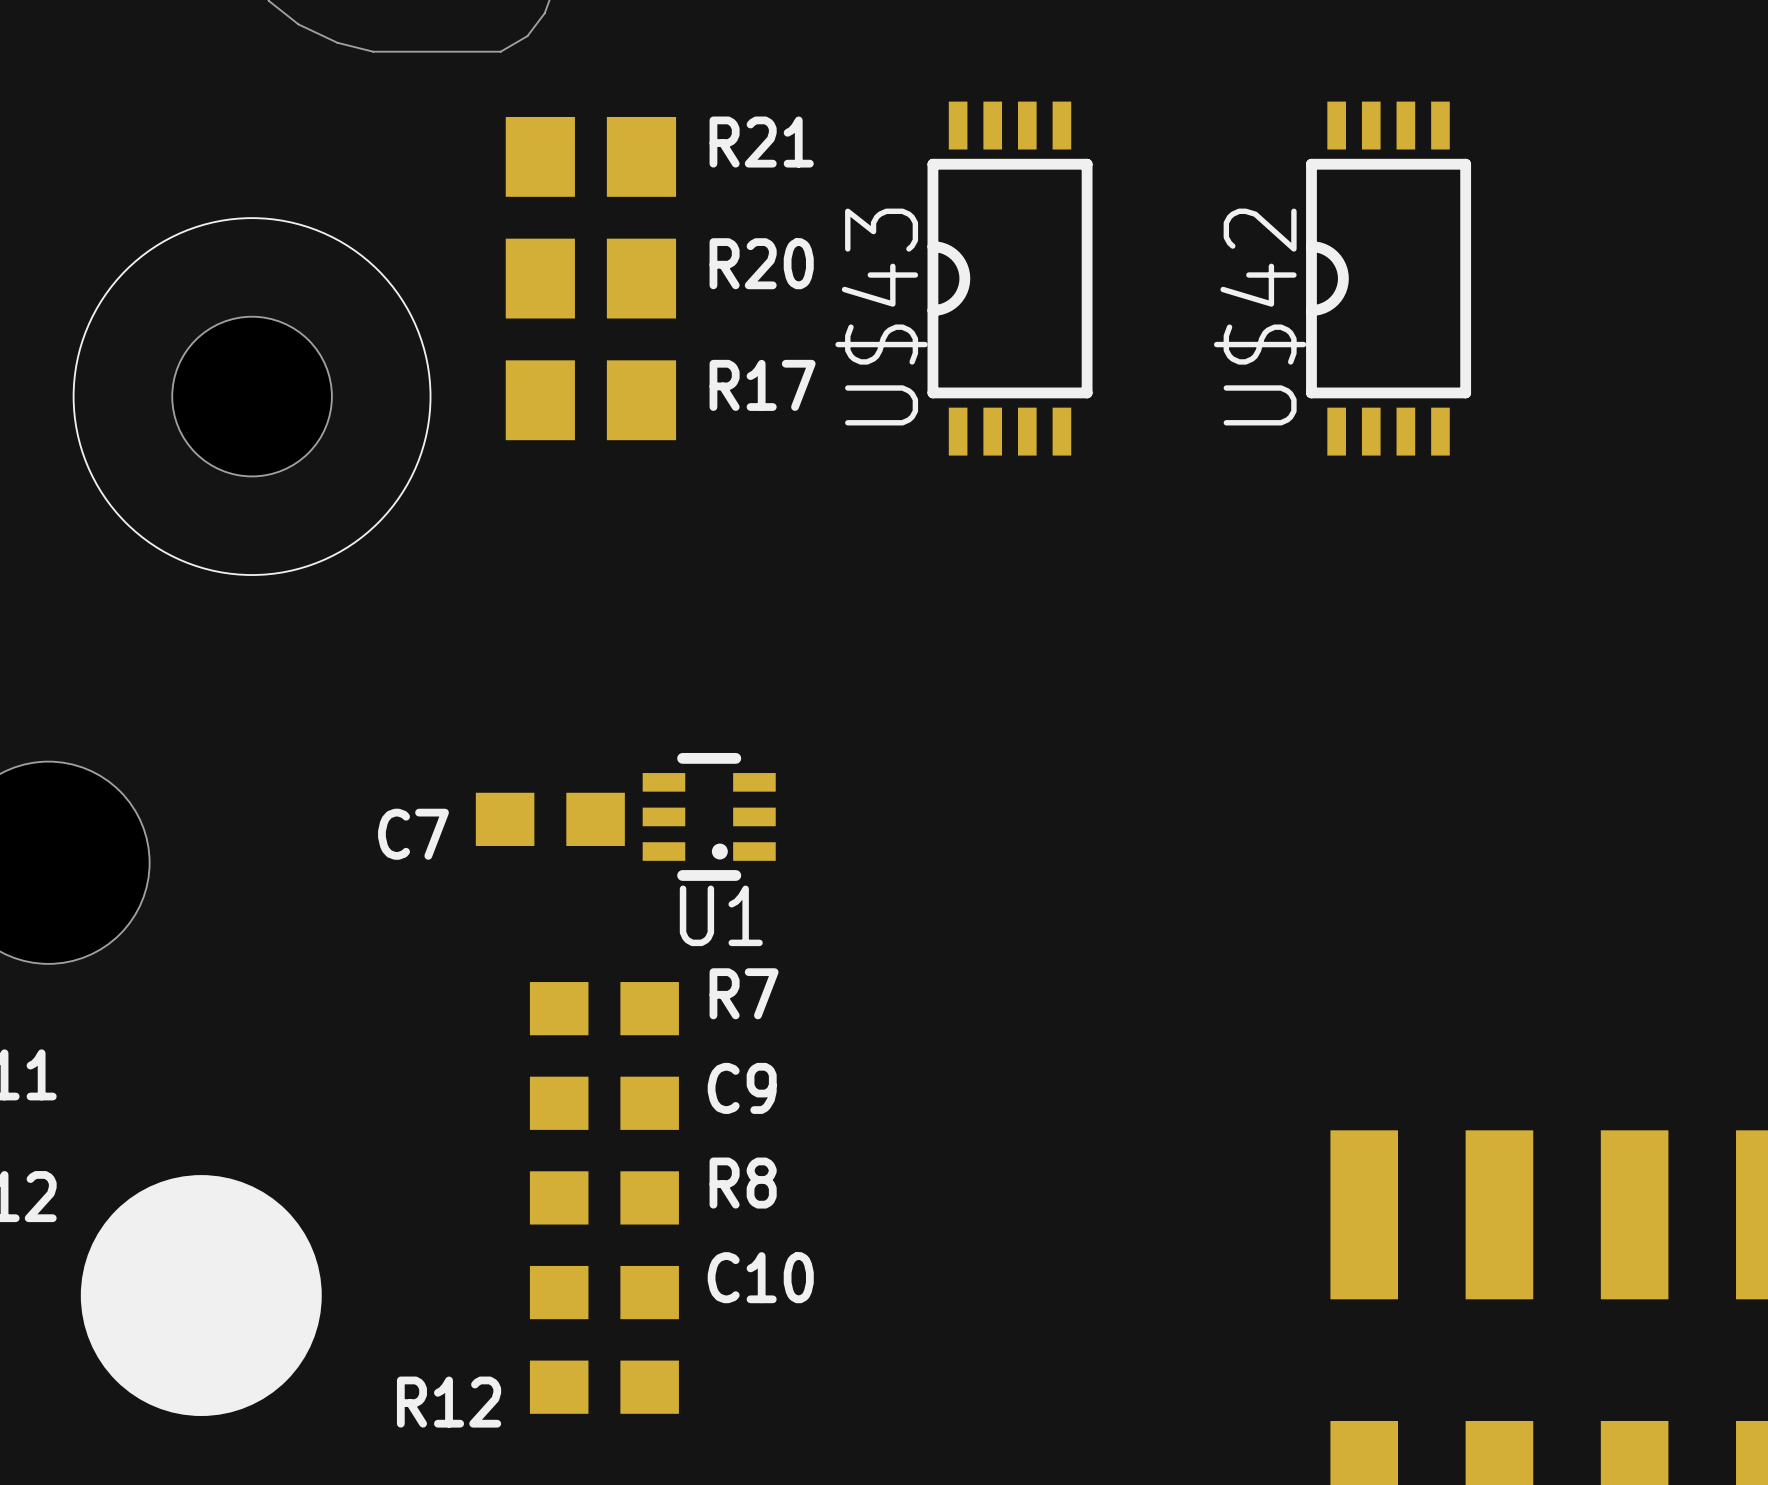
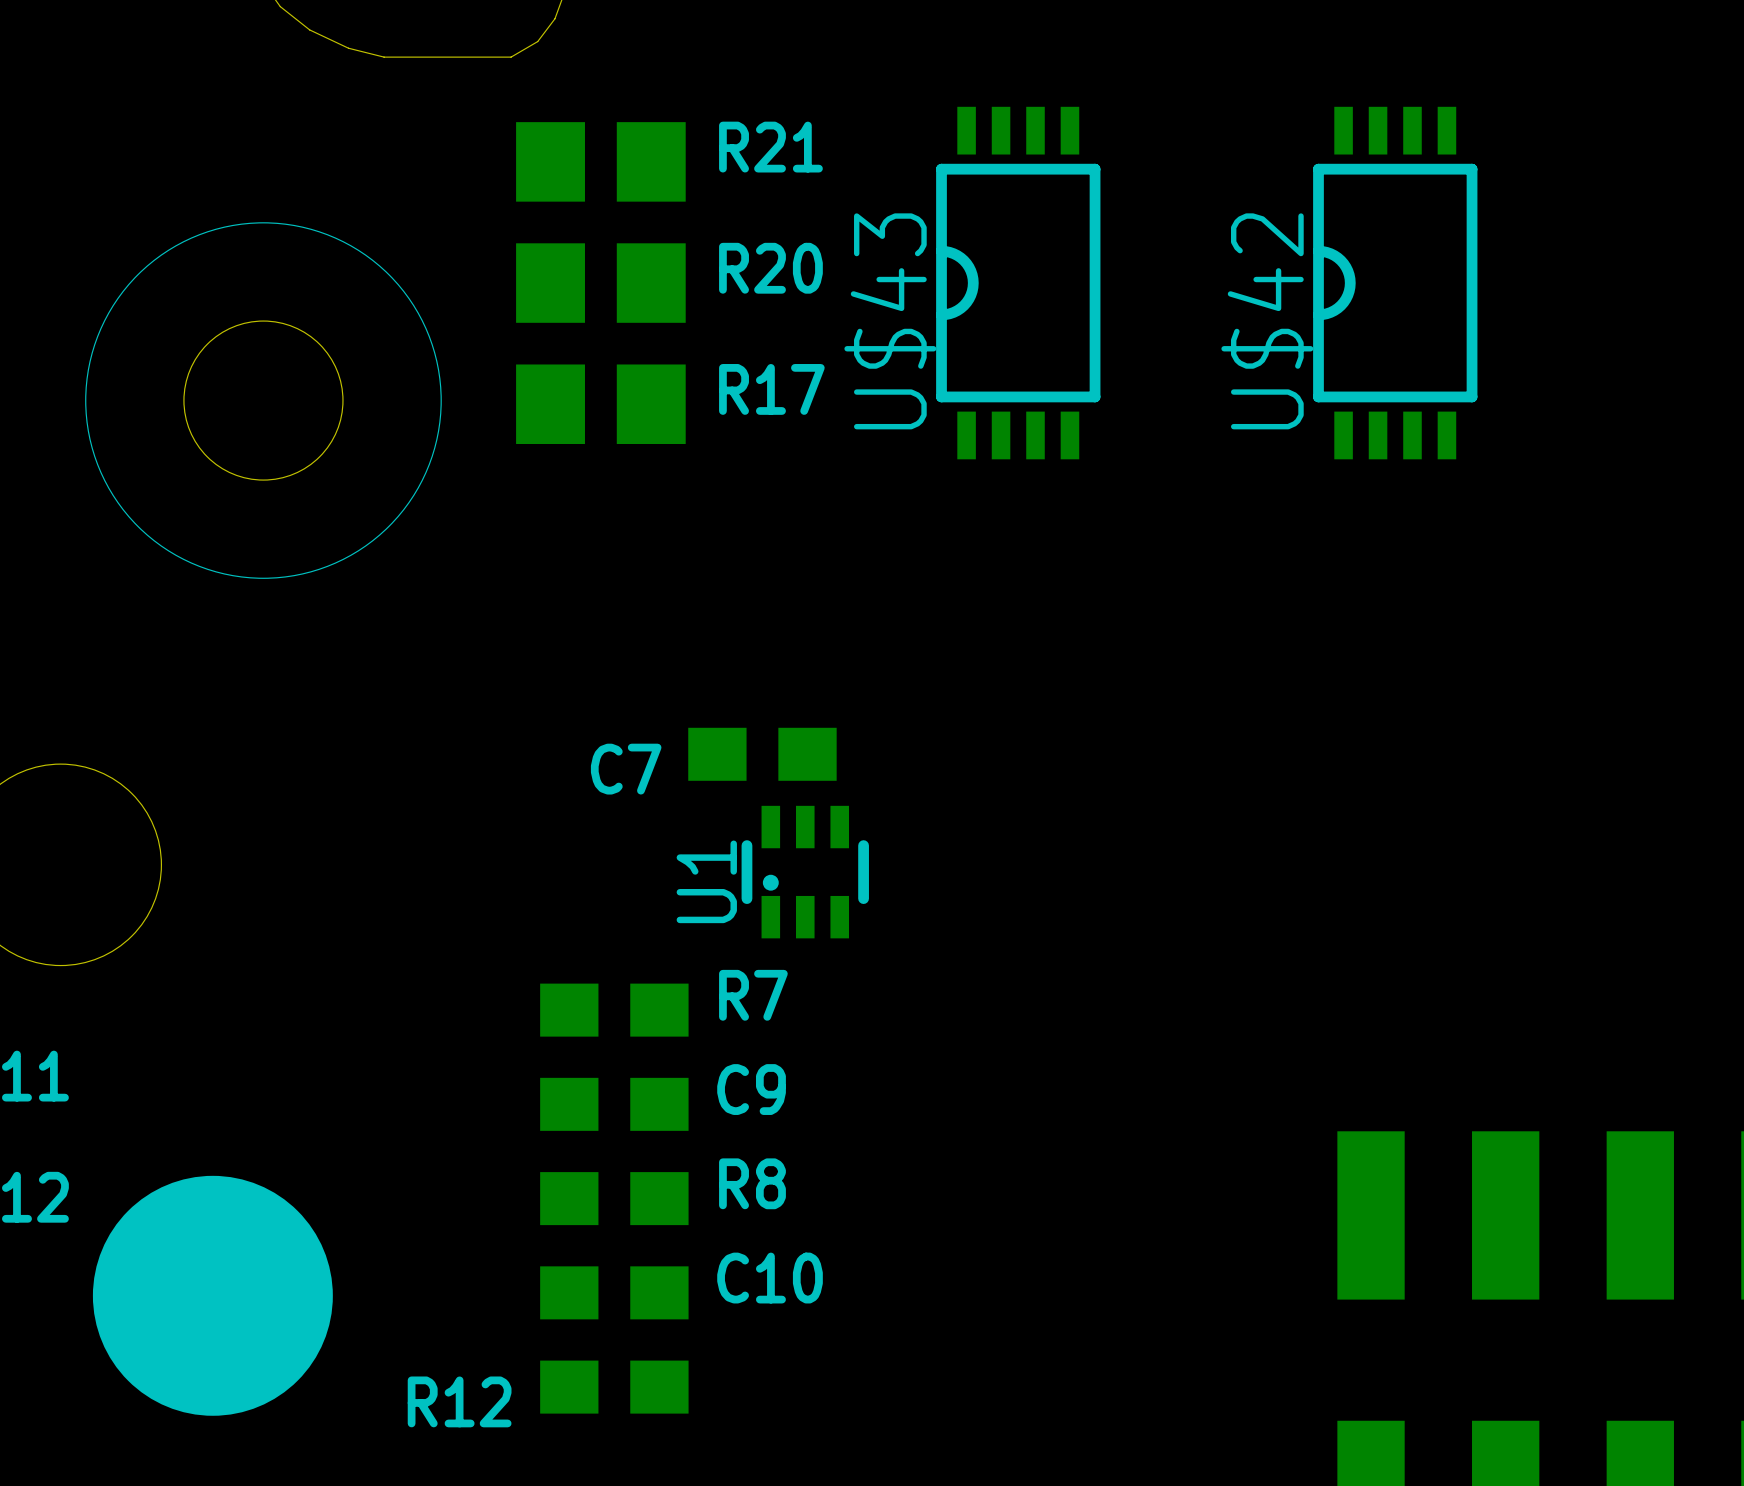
U1 rotation: 0° (709, 816) -> 90° clockwise (805, 872)
U1 position: (709, 816) -> (805, 872)
C7 position: (550, 819) -> (762, 754)

